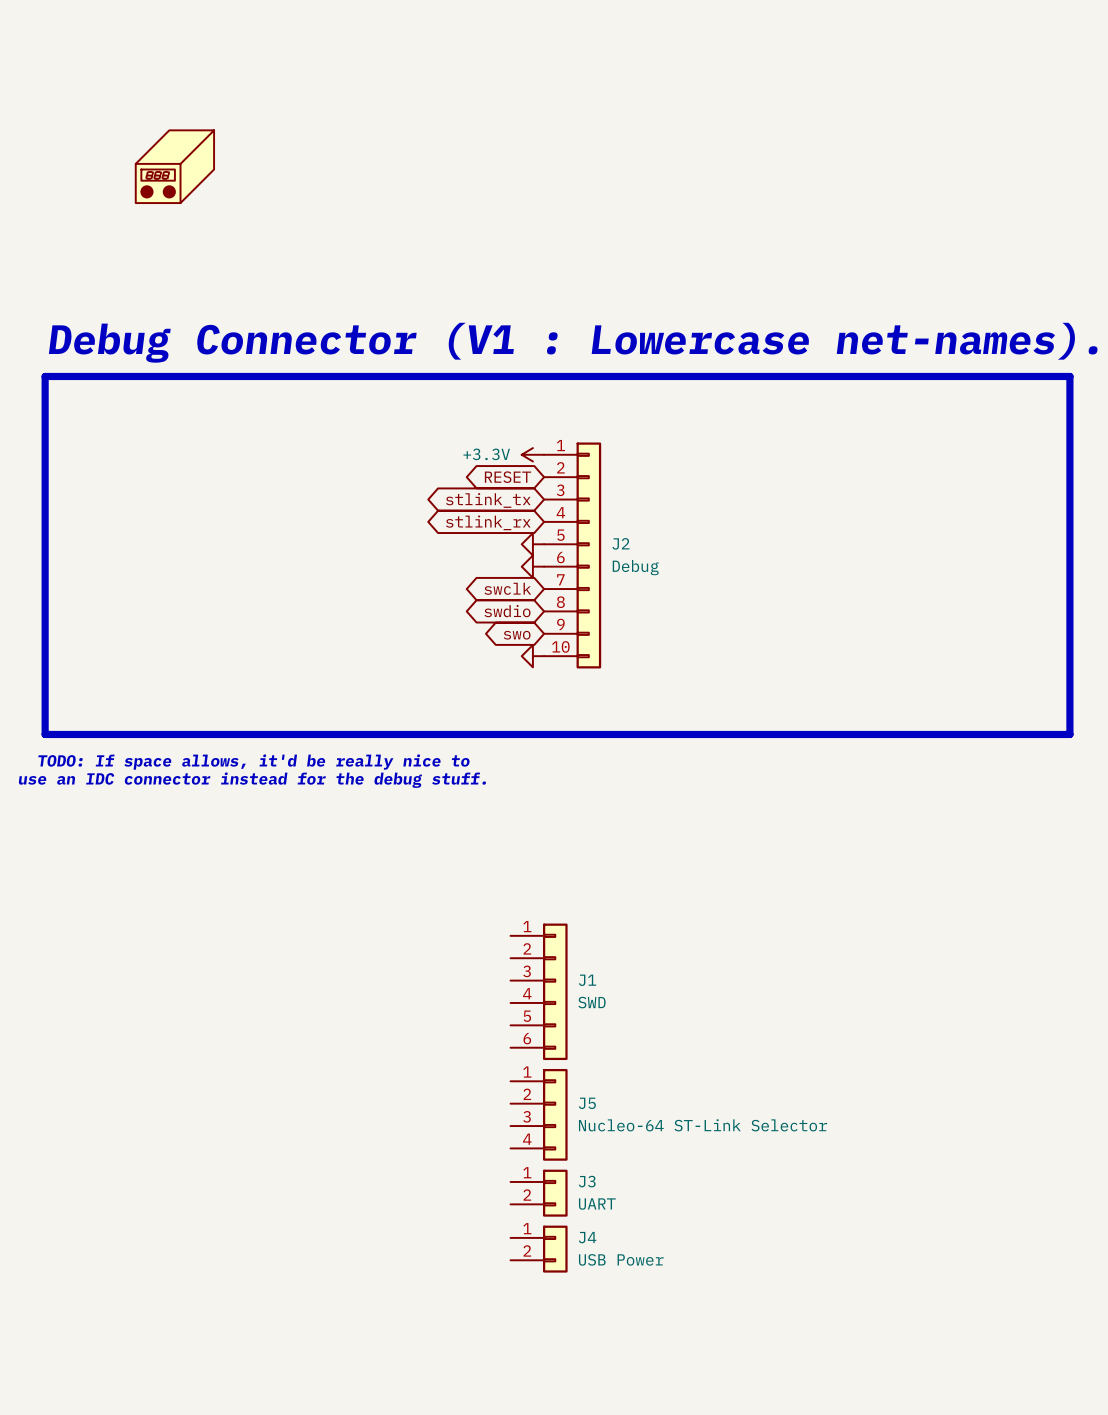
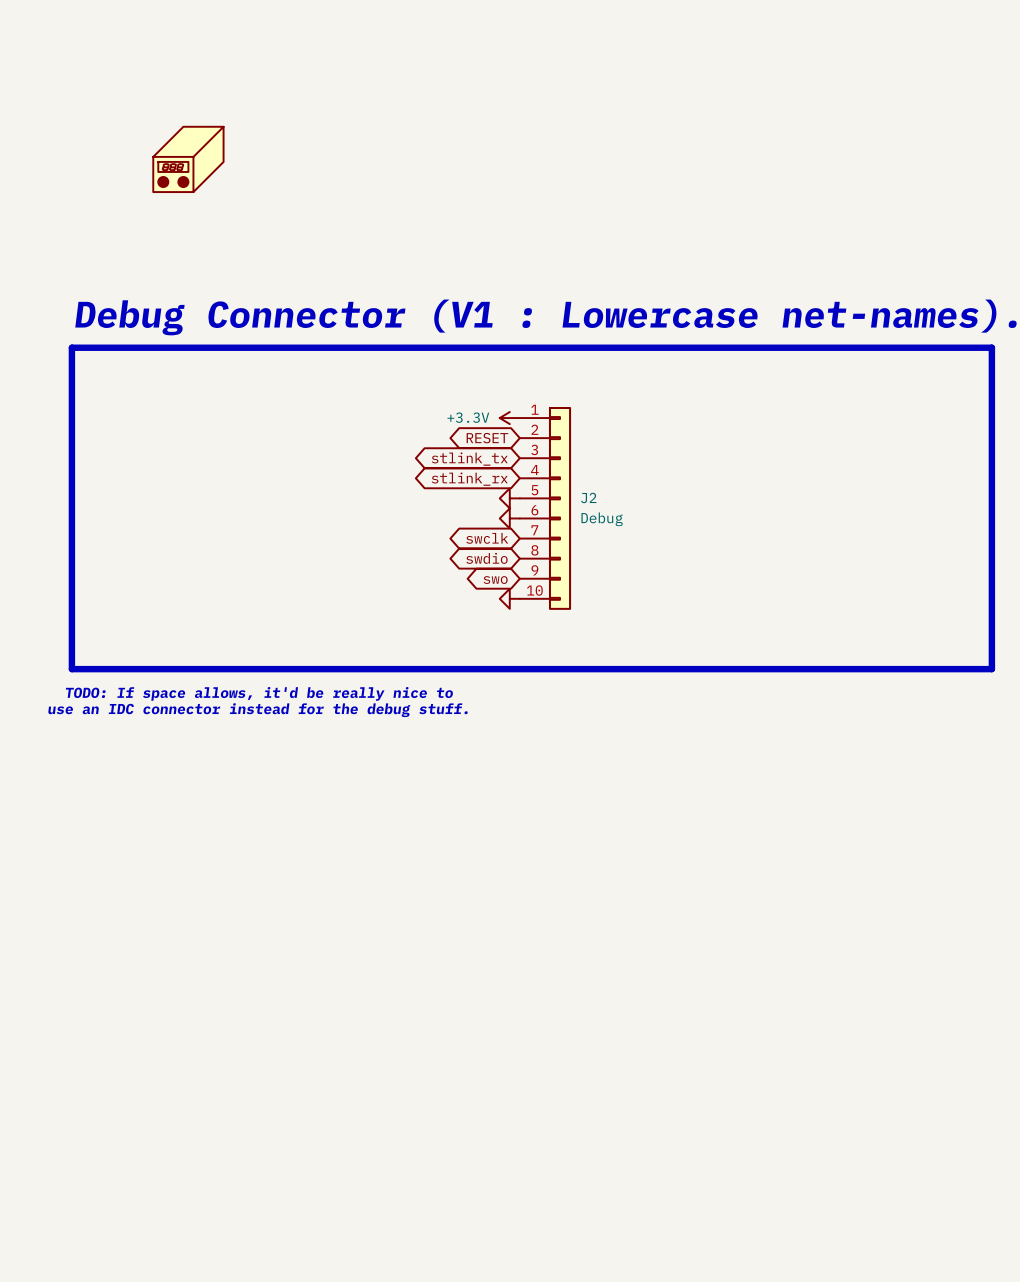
J1: SWD (539, 991) -> none
J5: Nucleo-64 ST-Link Selector (539, 1114) -> none
J3: UART (539, 1193) -> none
J4: USB Power (539, 1249) -> none

